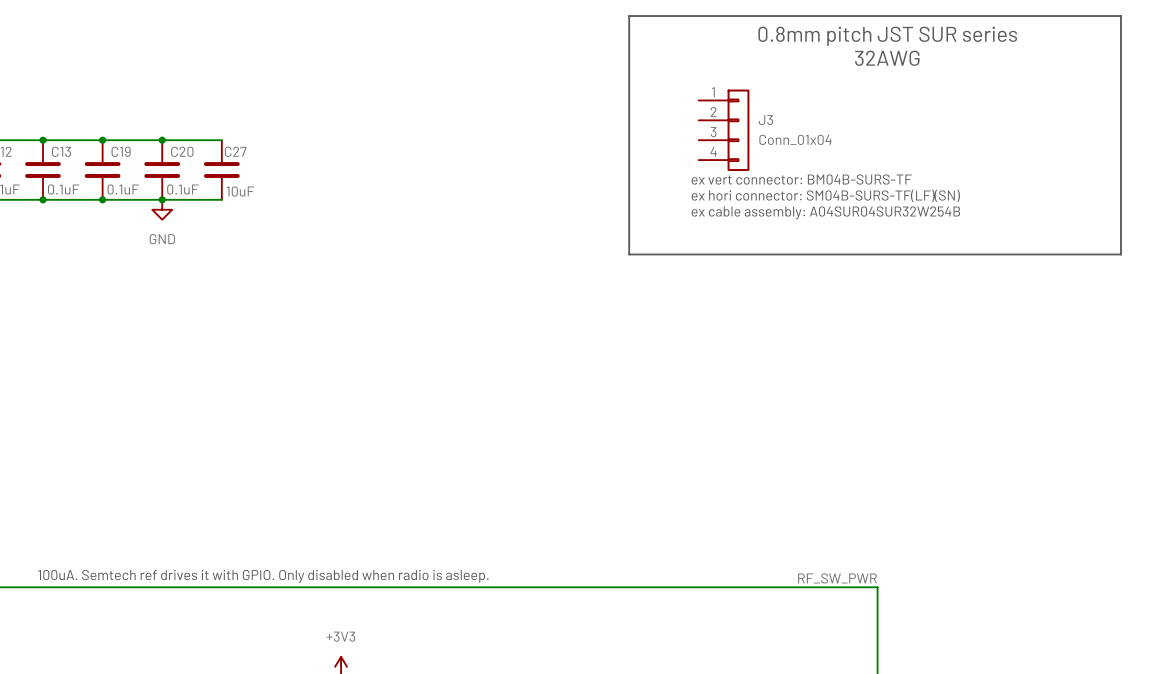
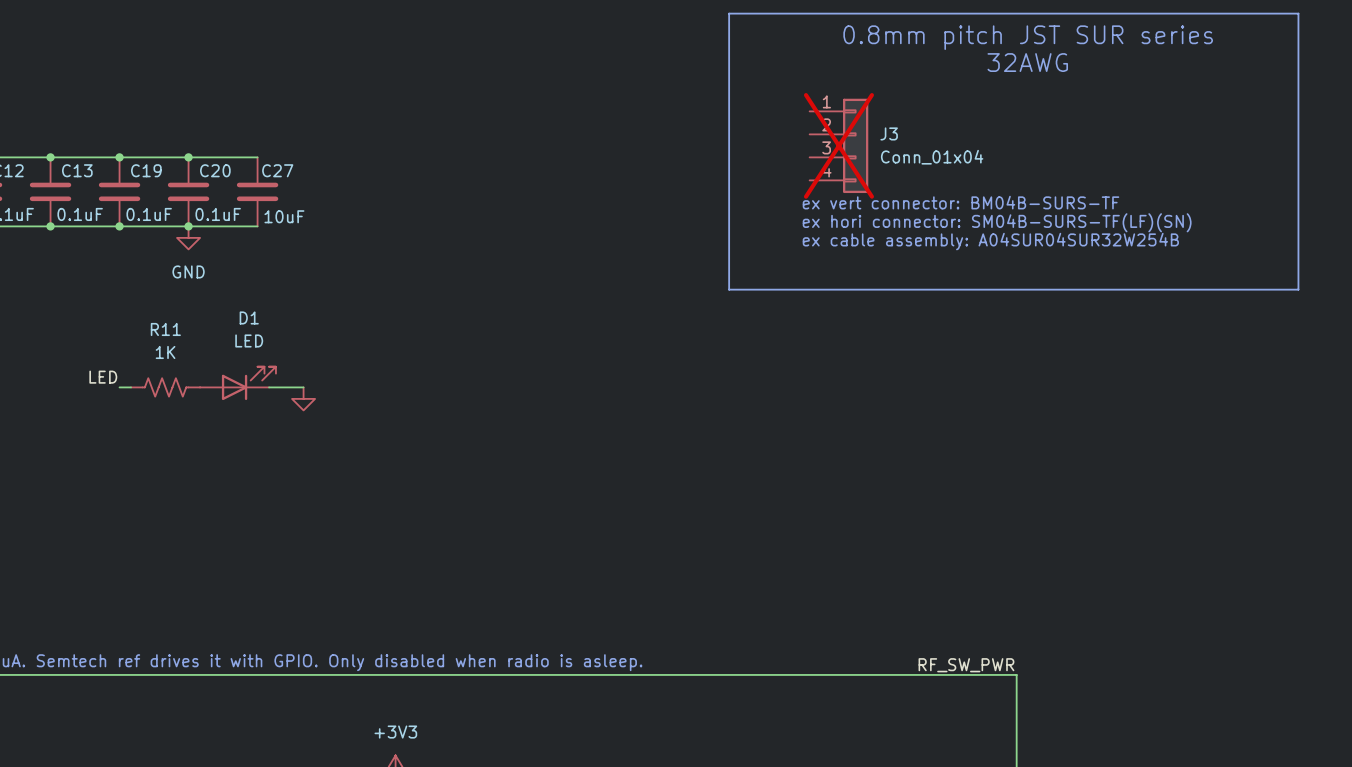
J3 do-not-place cross: none -> (838, 145)
label: none -> LED (103, 377)
D1: none -> LED (238, 383)
wire: none -> (119, 387) (131, 387)
R11: none -> 1K (165, 387)
wire: none -> (269, 387) (303, 387)
power symbol: none -> (303, 398)

